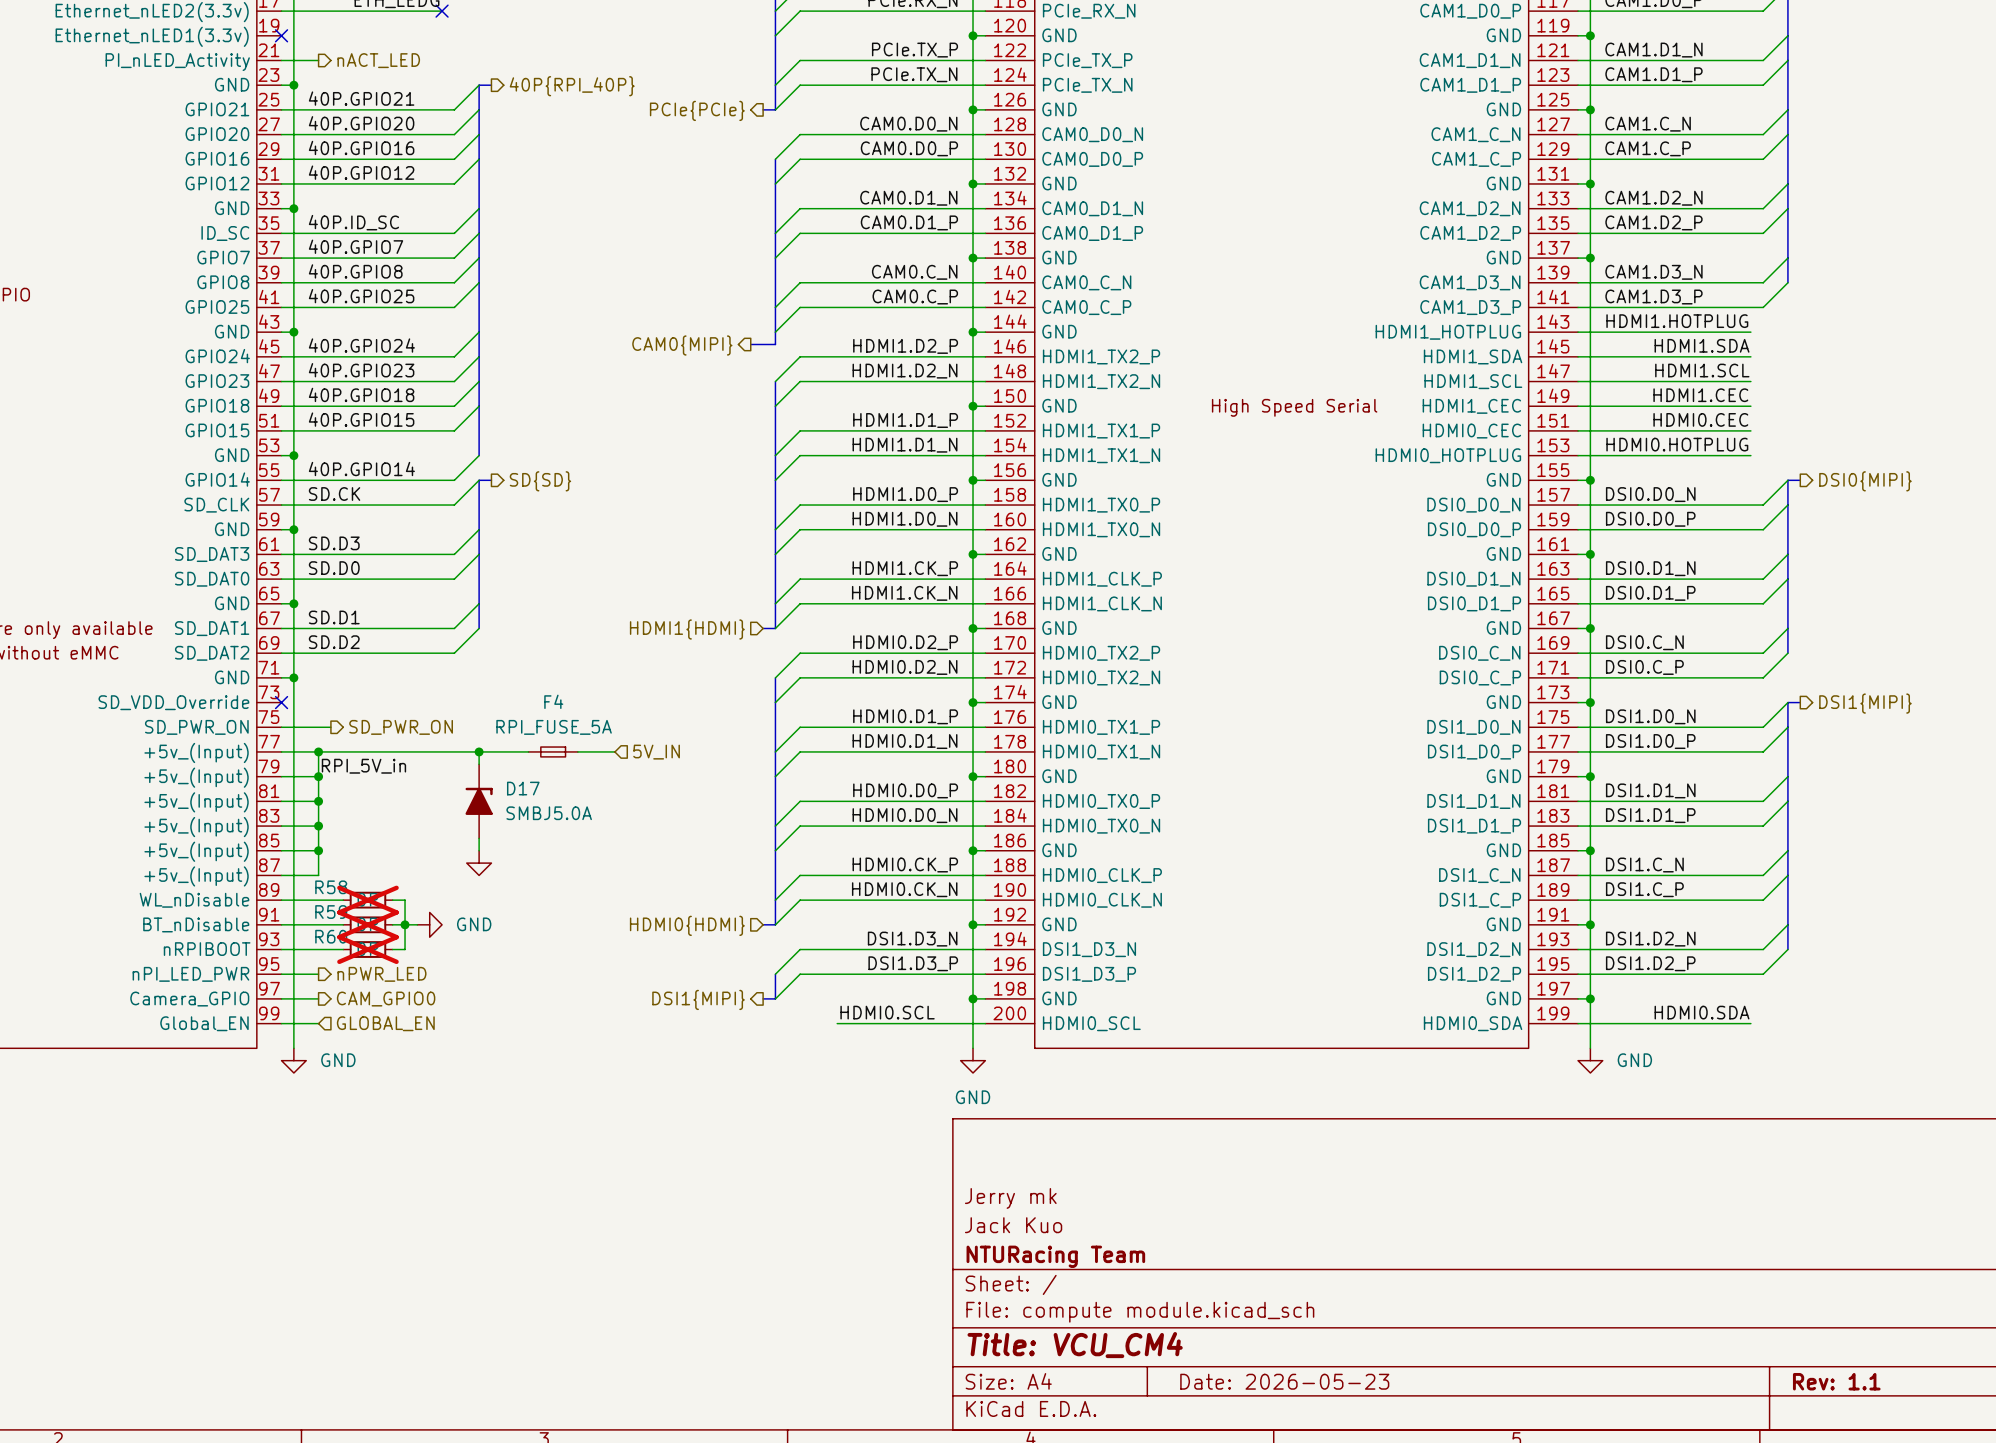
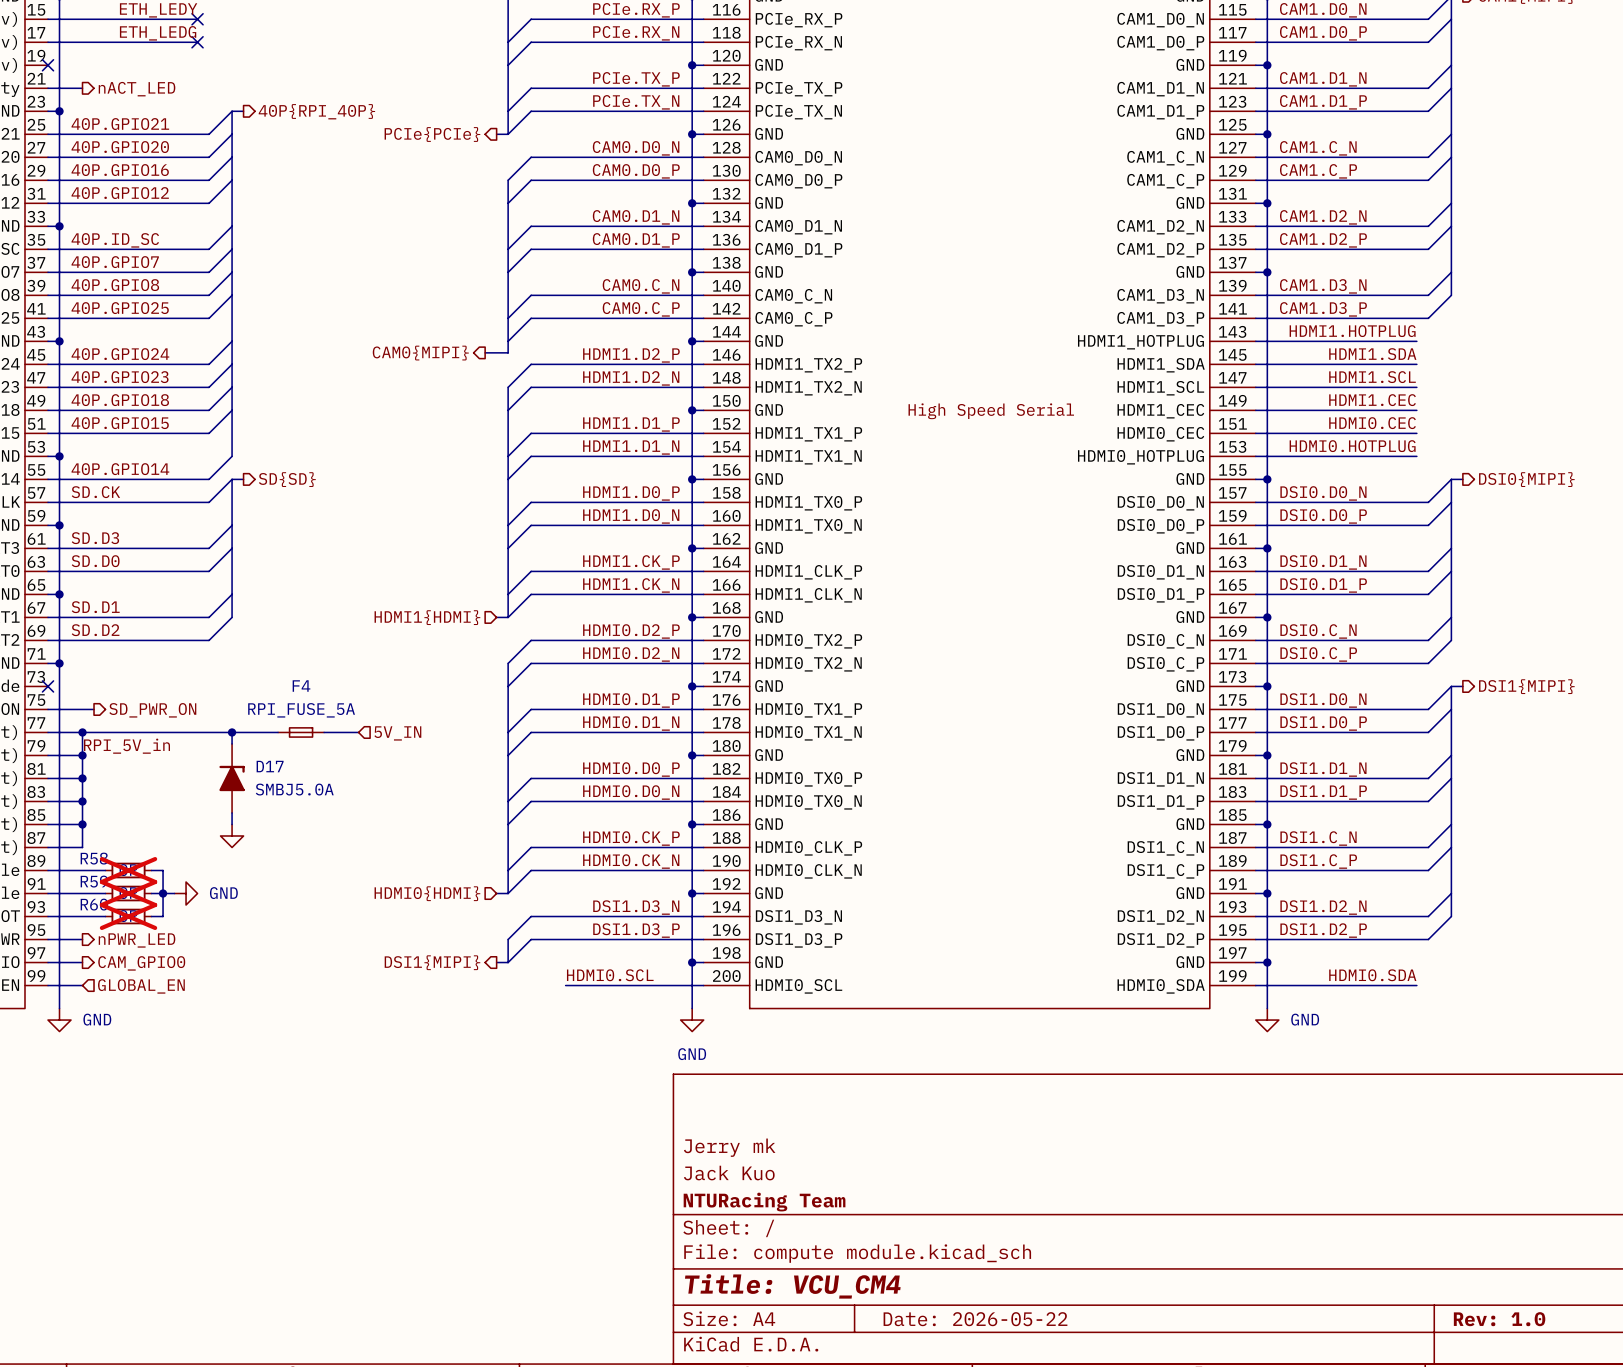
title block: Date: 2026-05-23 (1284, 1381) -> Date: 2026-05-22 (975, 1319)
title block: Rev: 1.1 (1836, 1381) -> Rev: 1.0 (1499, 1319)

